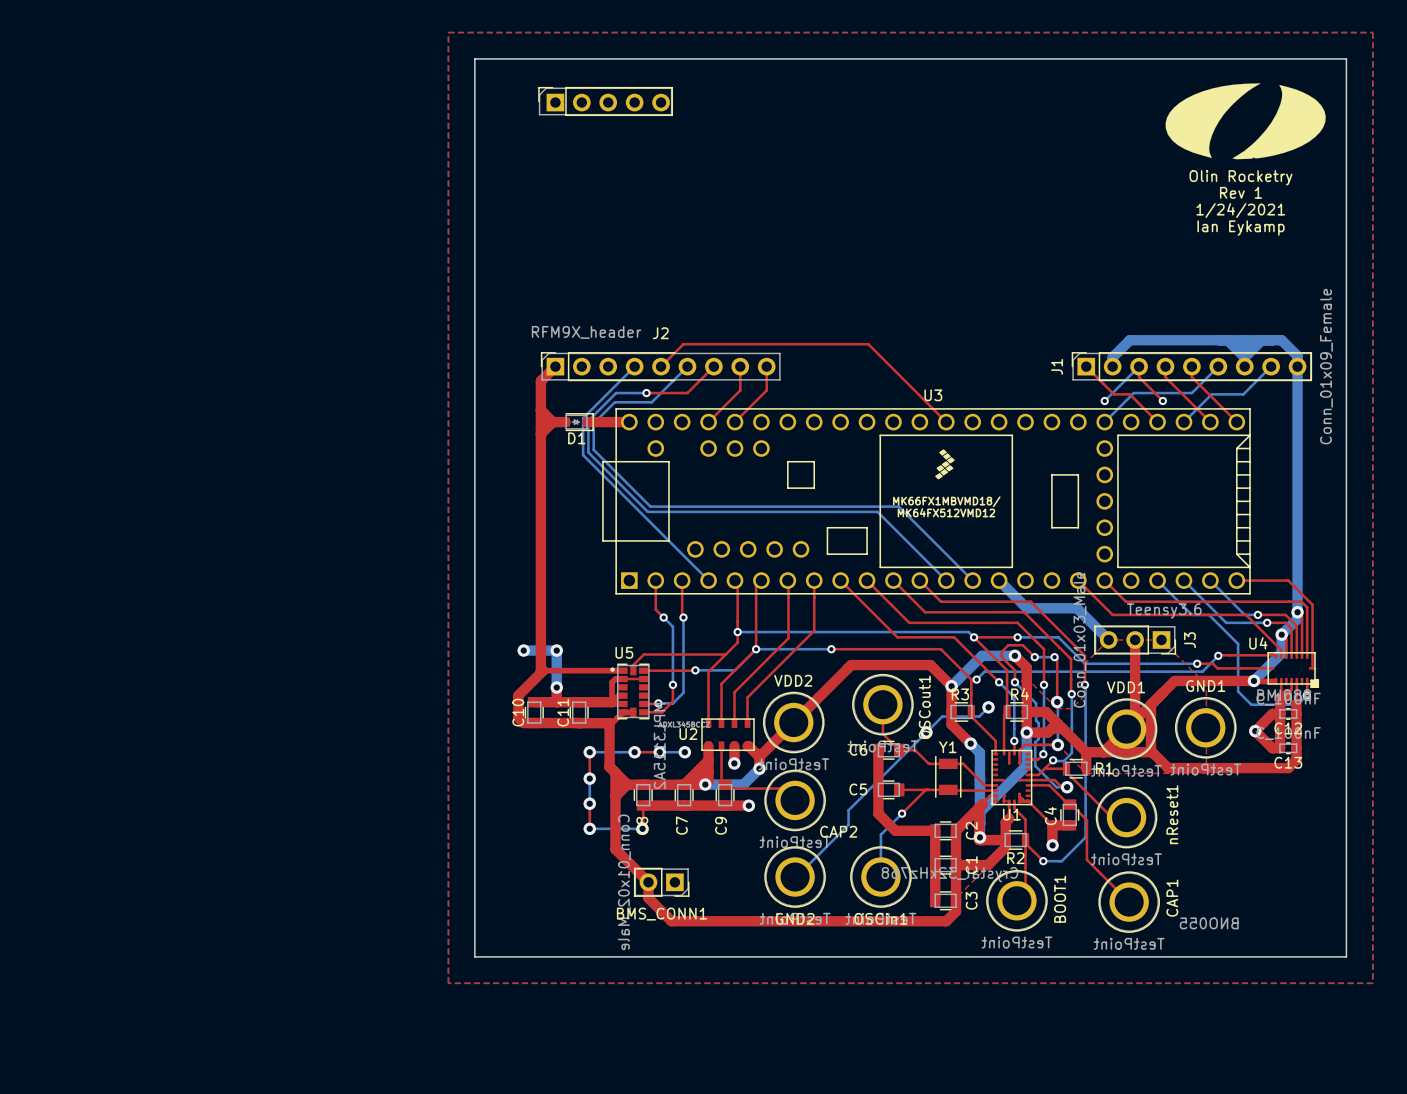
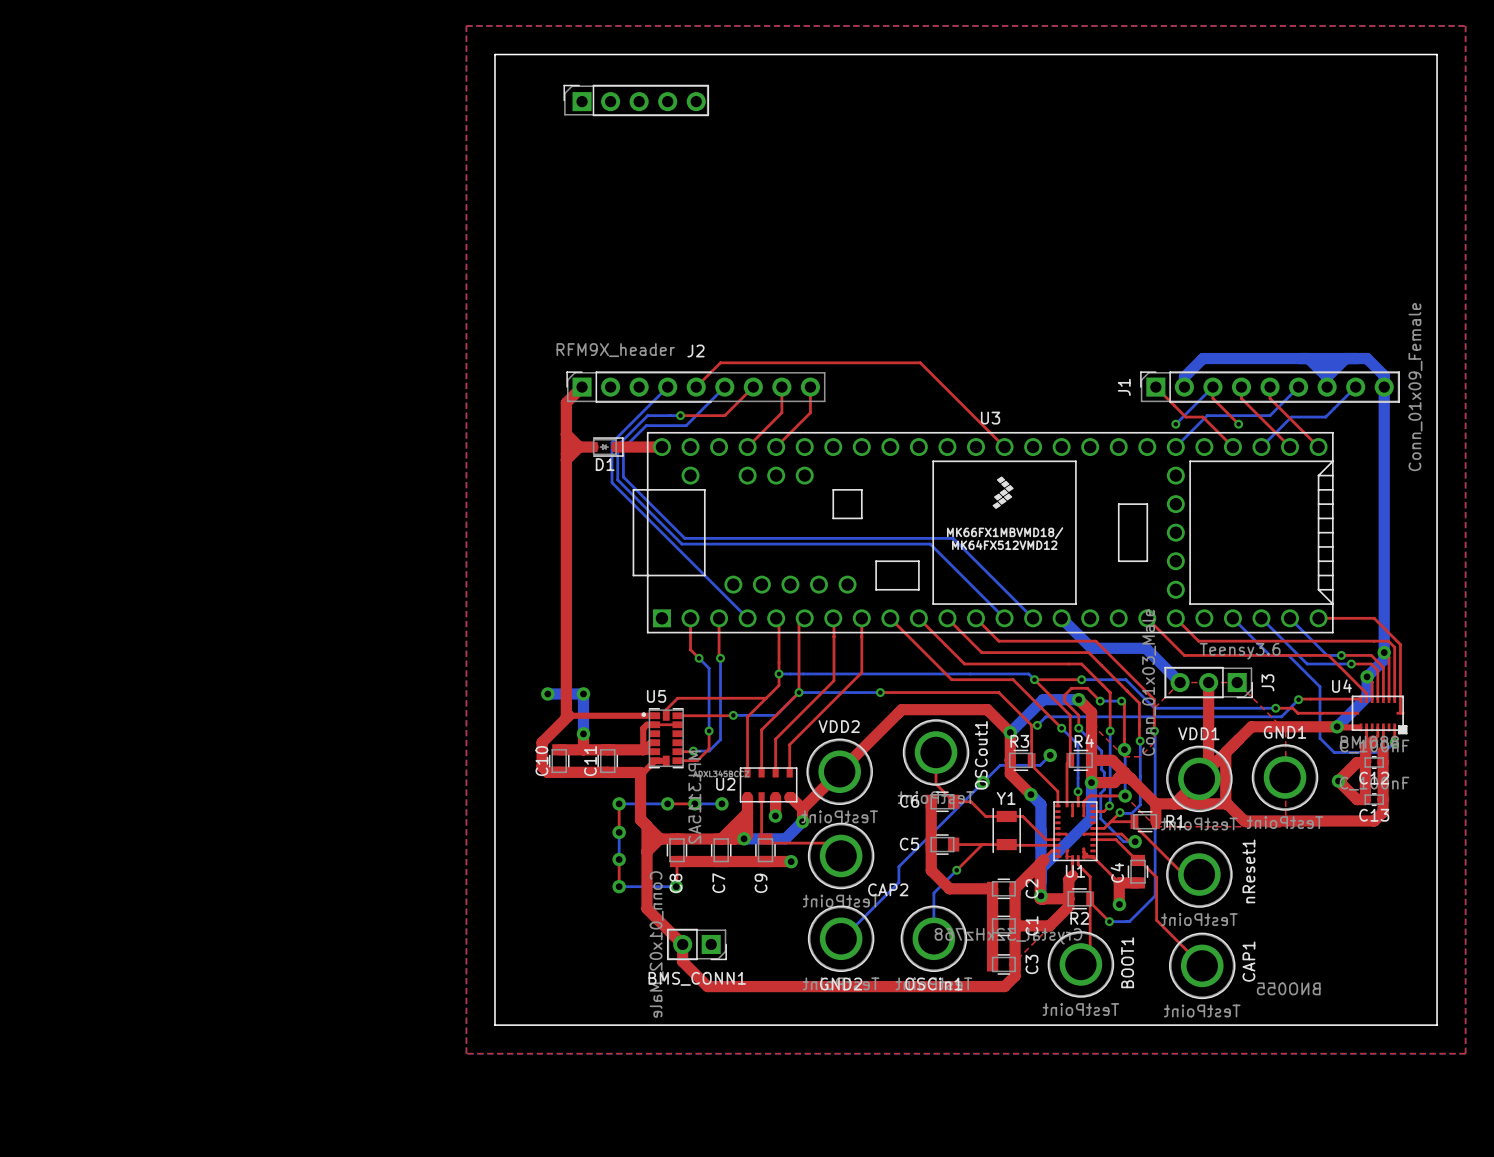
drawing: [1165, 83, 1326, 160] -> none
text: Olin Rocketry (1241, 177) -> none
text: Rev 1 (1241, 192) -> none
text: 1/24/2021 (1240, 210) -> none
text: Ian Eykamp (1241, 228) -> none

